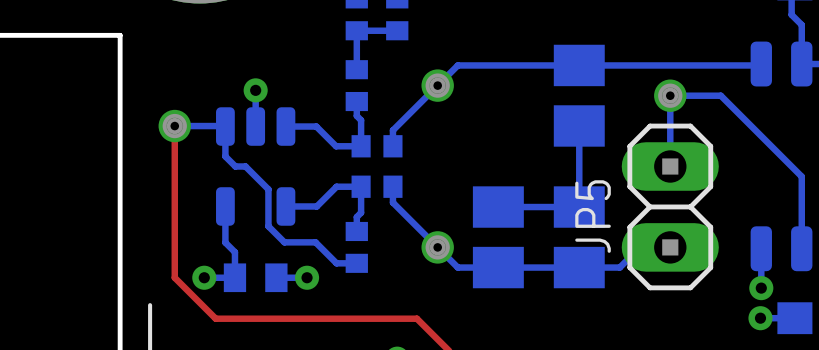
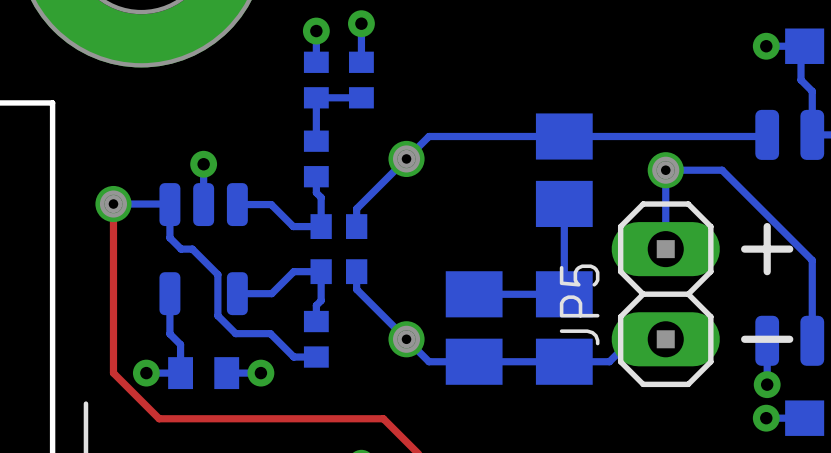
line: none -> (767, 226) (767, 271)
line: none -> (744, 249) (789, 249)
line: none -> (744, 339) (789, 339)

